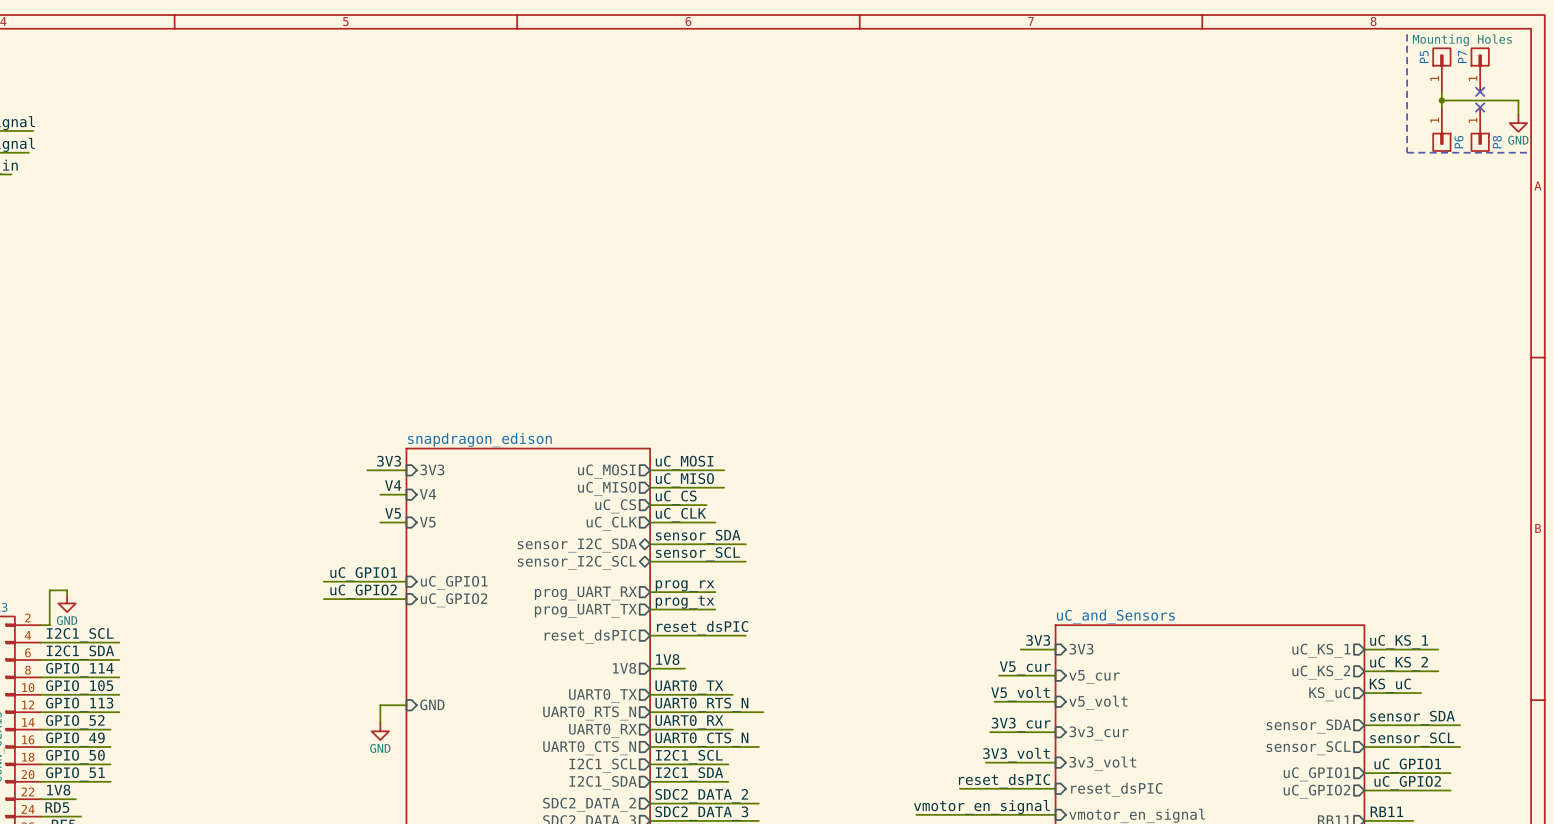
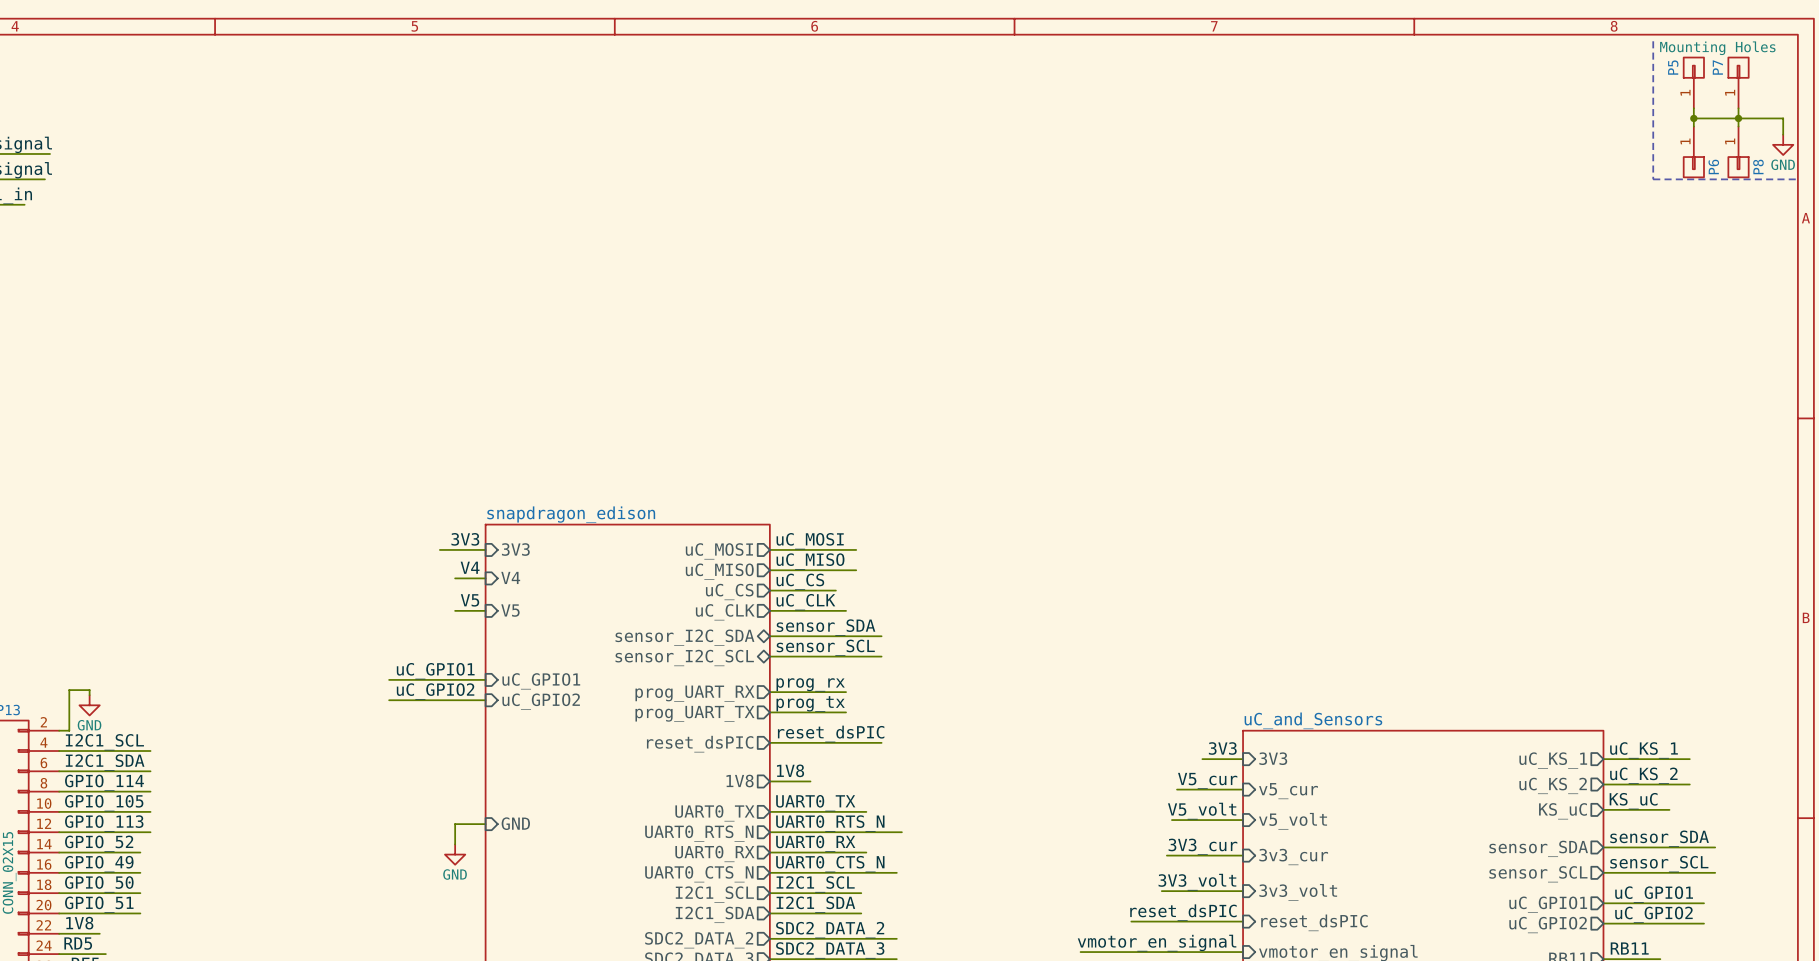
wire: none -> (1738, 108) (1738, 126)
no-connect mark: (1480, 91) -> none
junction: none -> (1738, 118)
no-connect mark: (1480, 107) -> none

